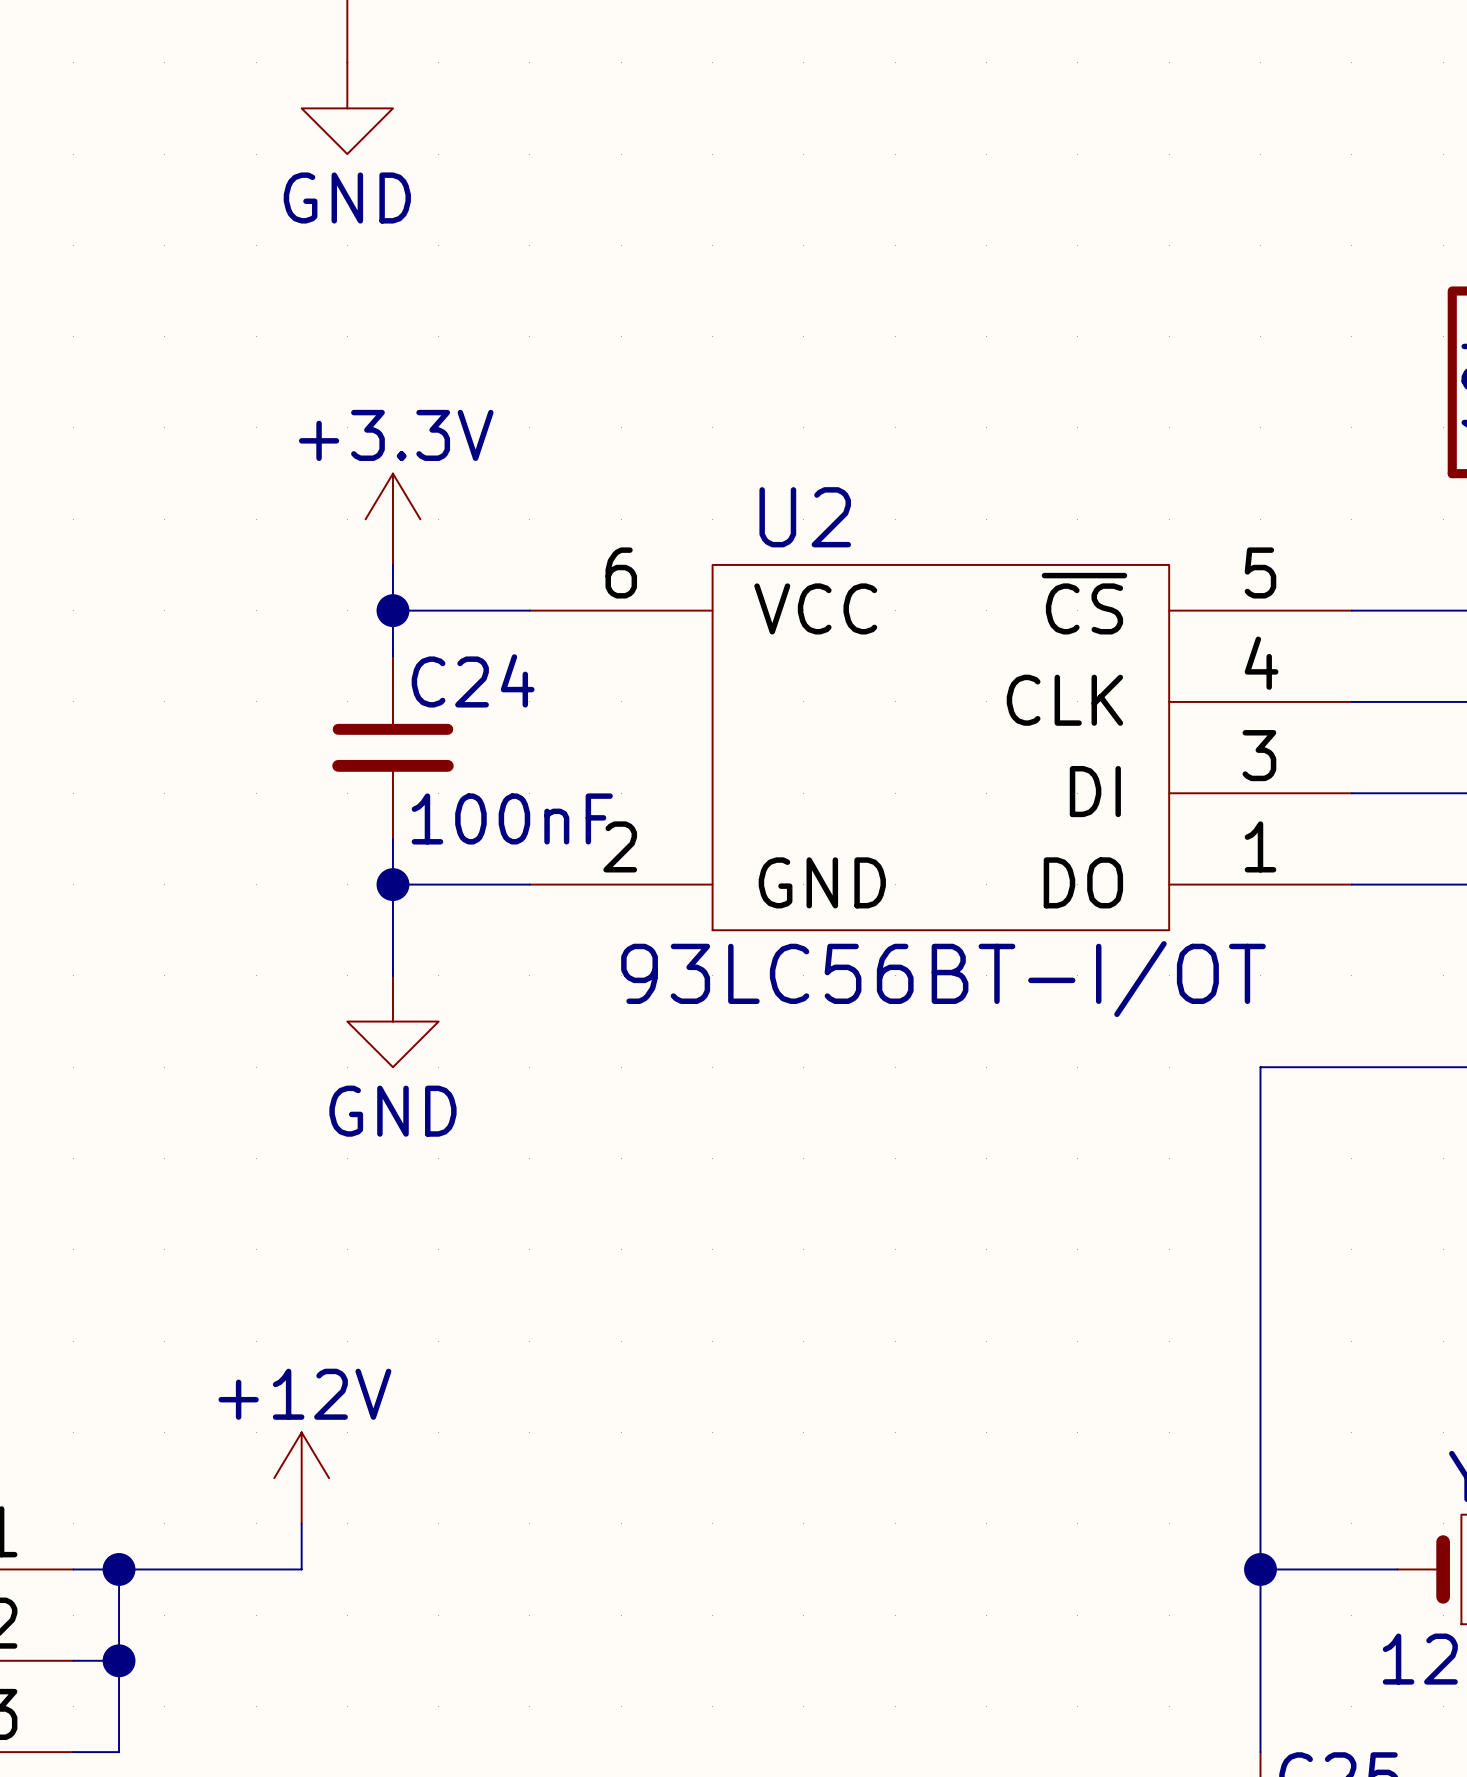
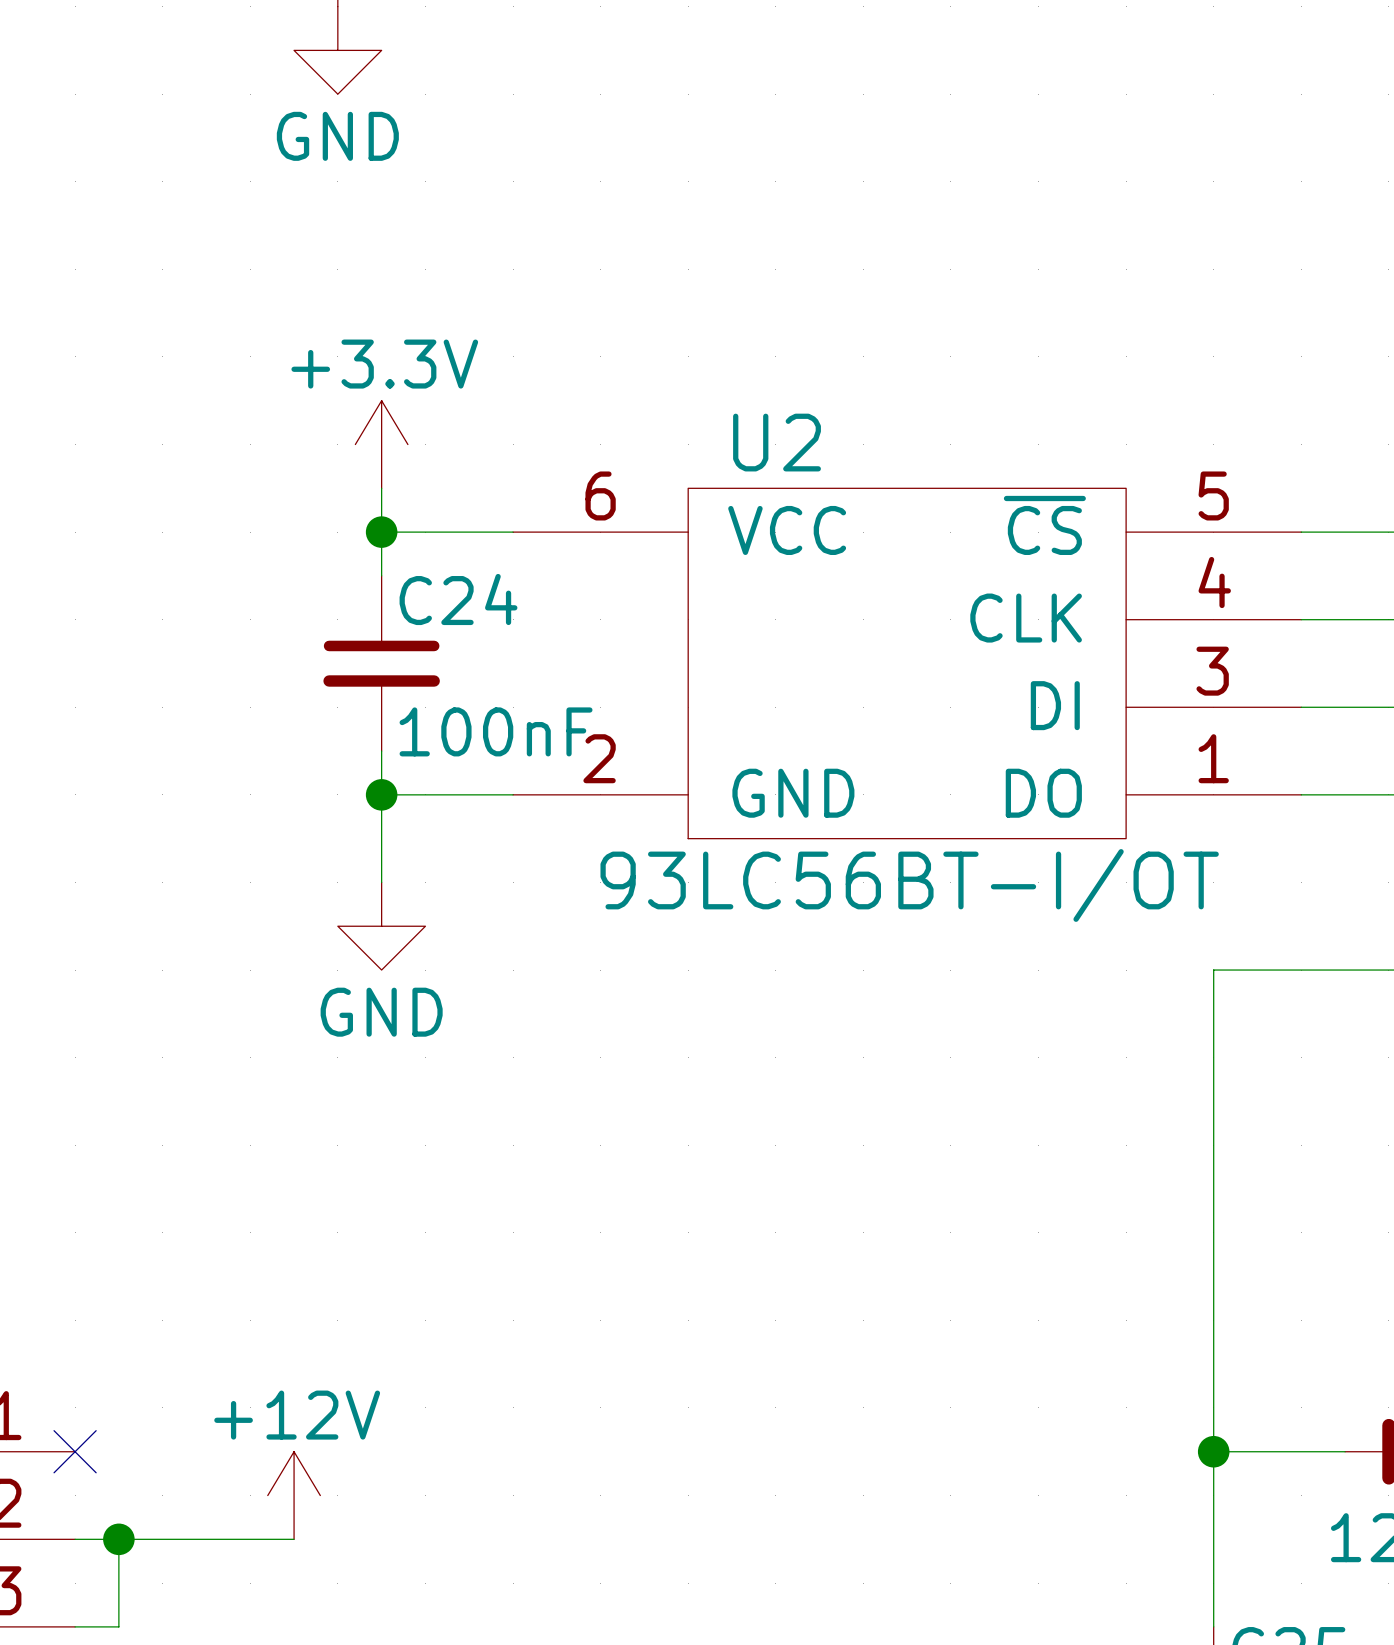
power symbol position: +12V (301, 1478) -> +12V (294, 1495)
wire: (301, 1523) (301, 1569) (73, 1569) -> none
no-connect mark: none -> (75, 1451)
wire: (119, 1569) (119, 1660) -> (294, 1539) (118, 1539)
junction: (119, 1569) -> none

